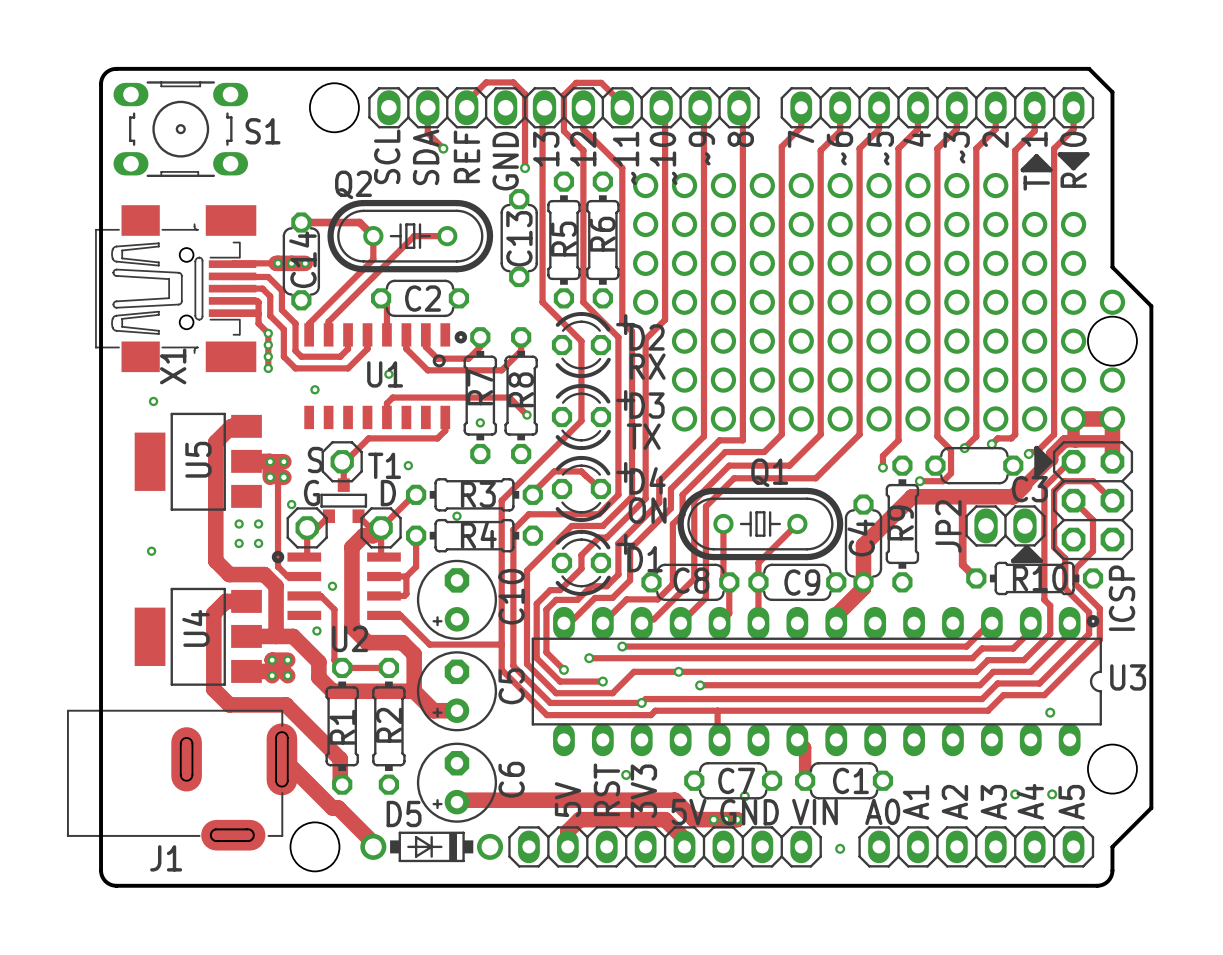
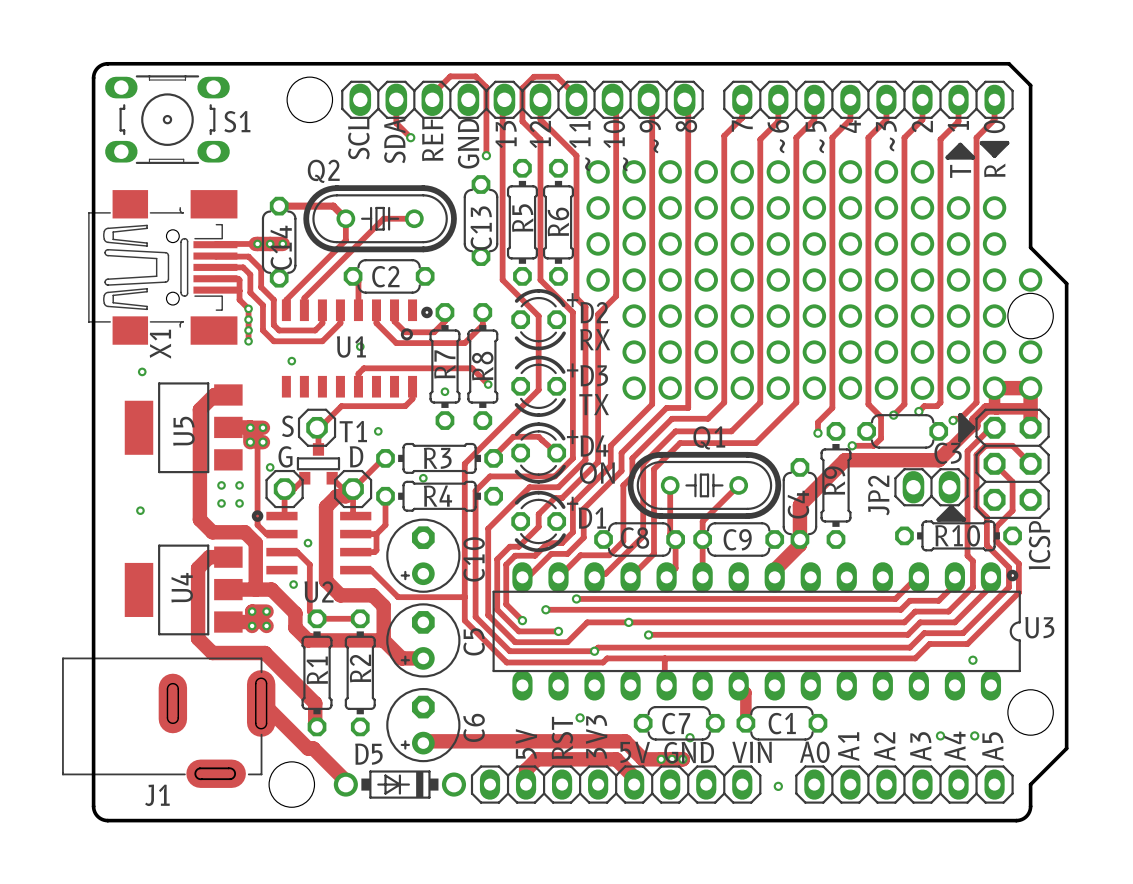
track: (962, 496) (962, 564) (976, 578) -> none

